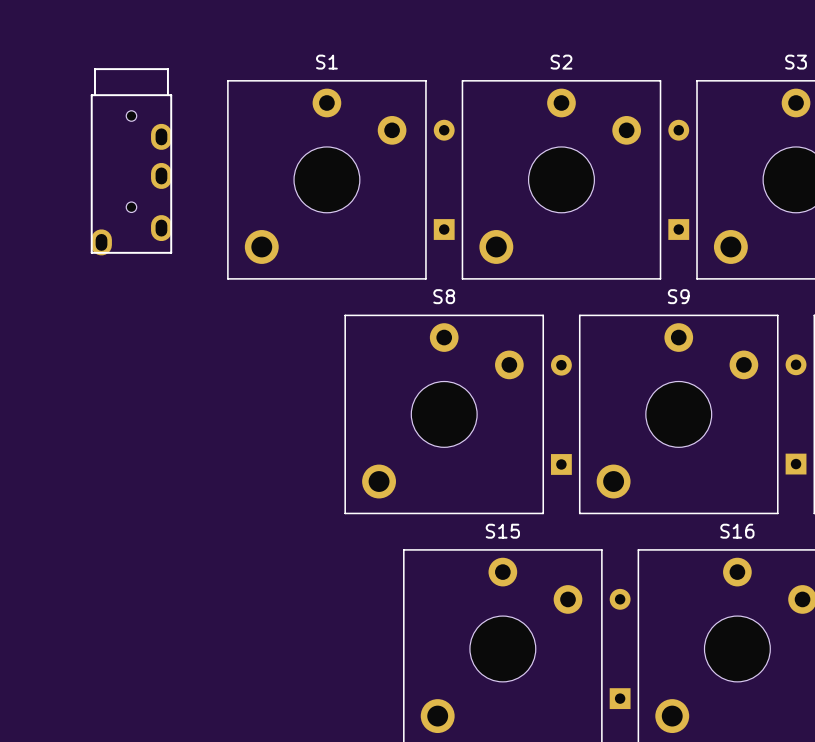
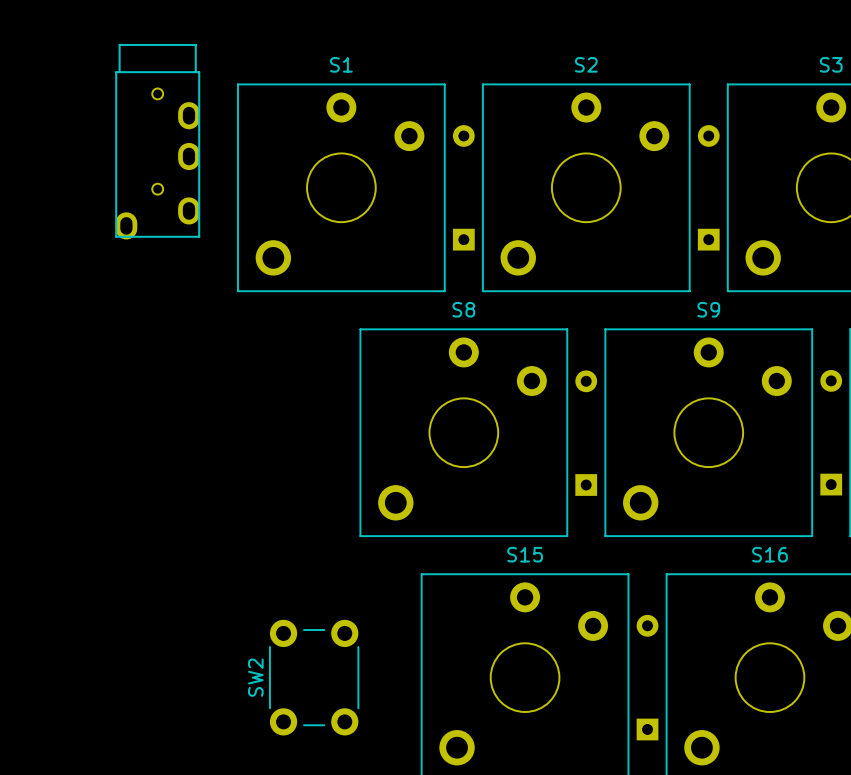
part position: (131, 161) -> (157, 141)
SW2: none -> (314, 677)

